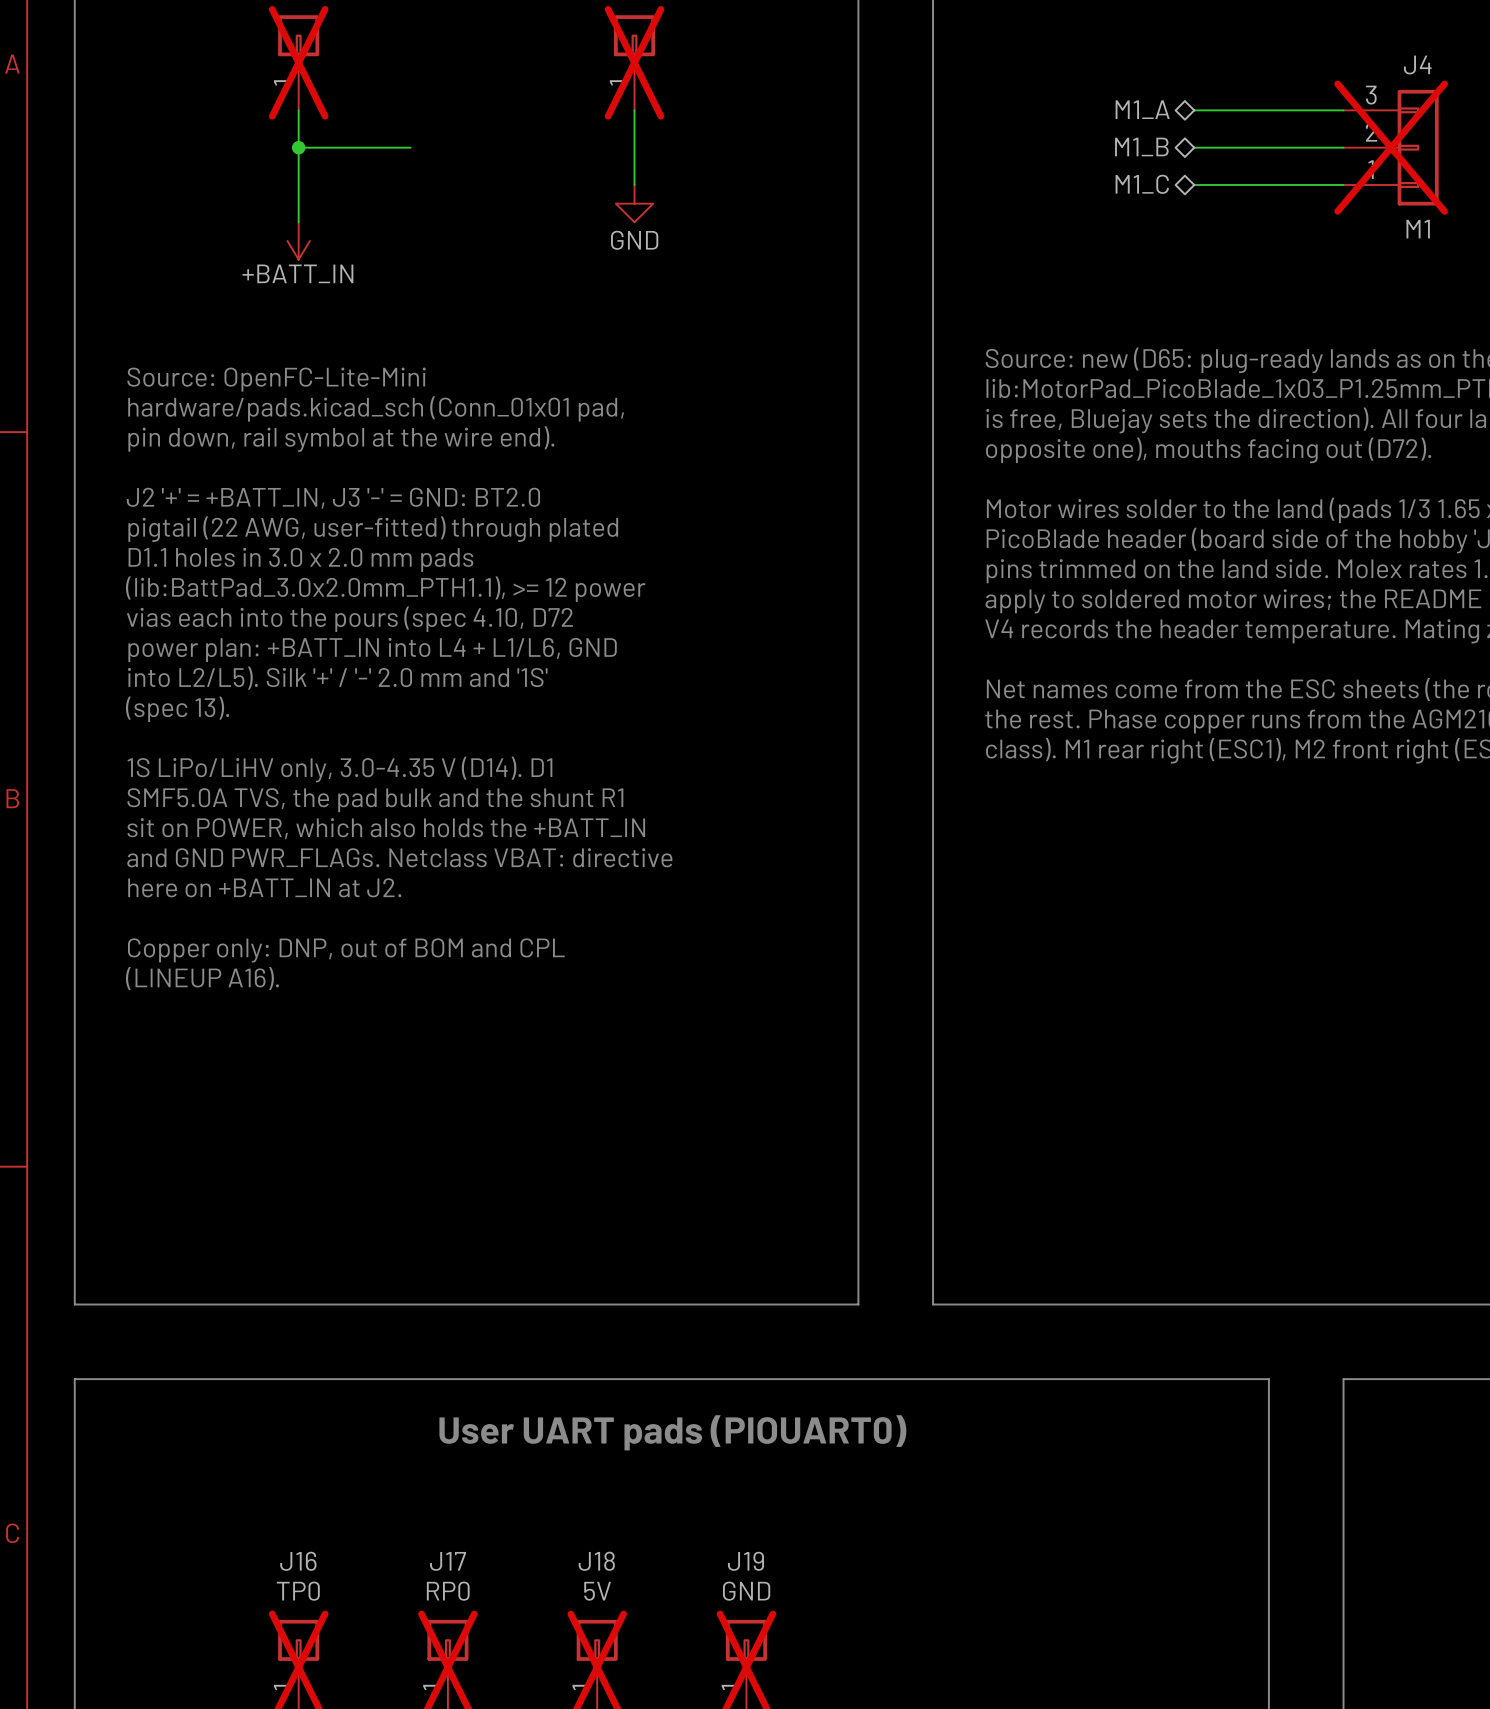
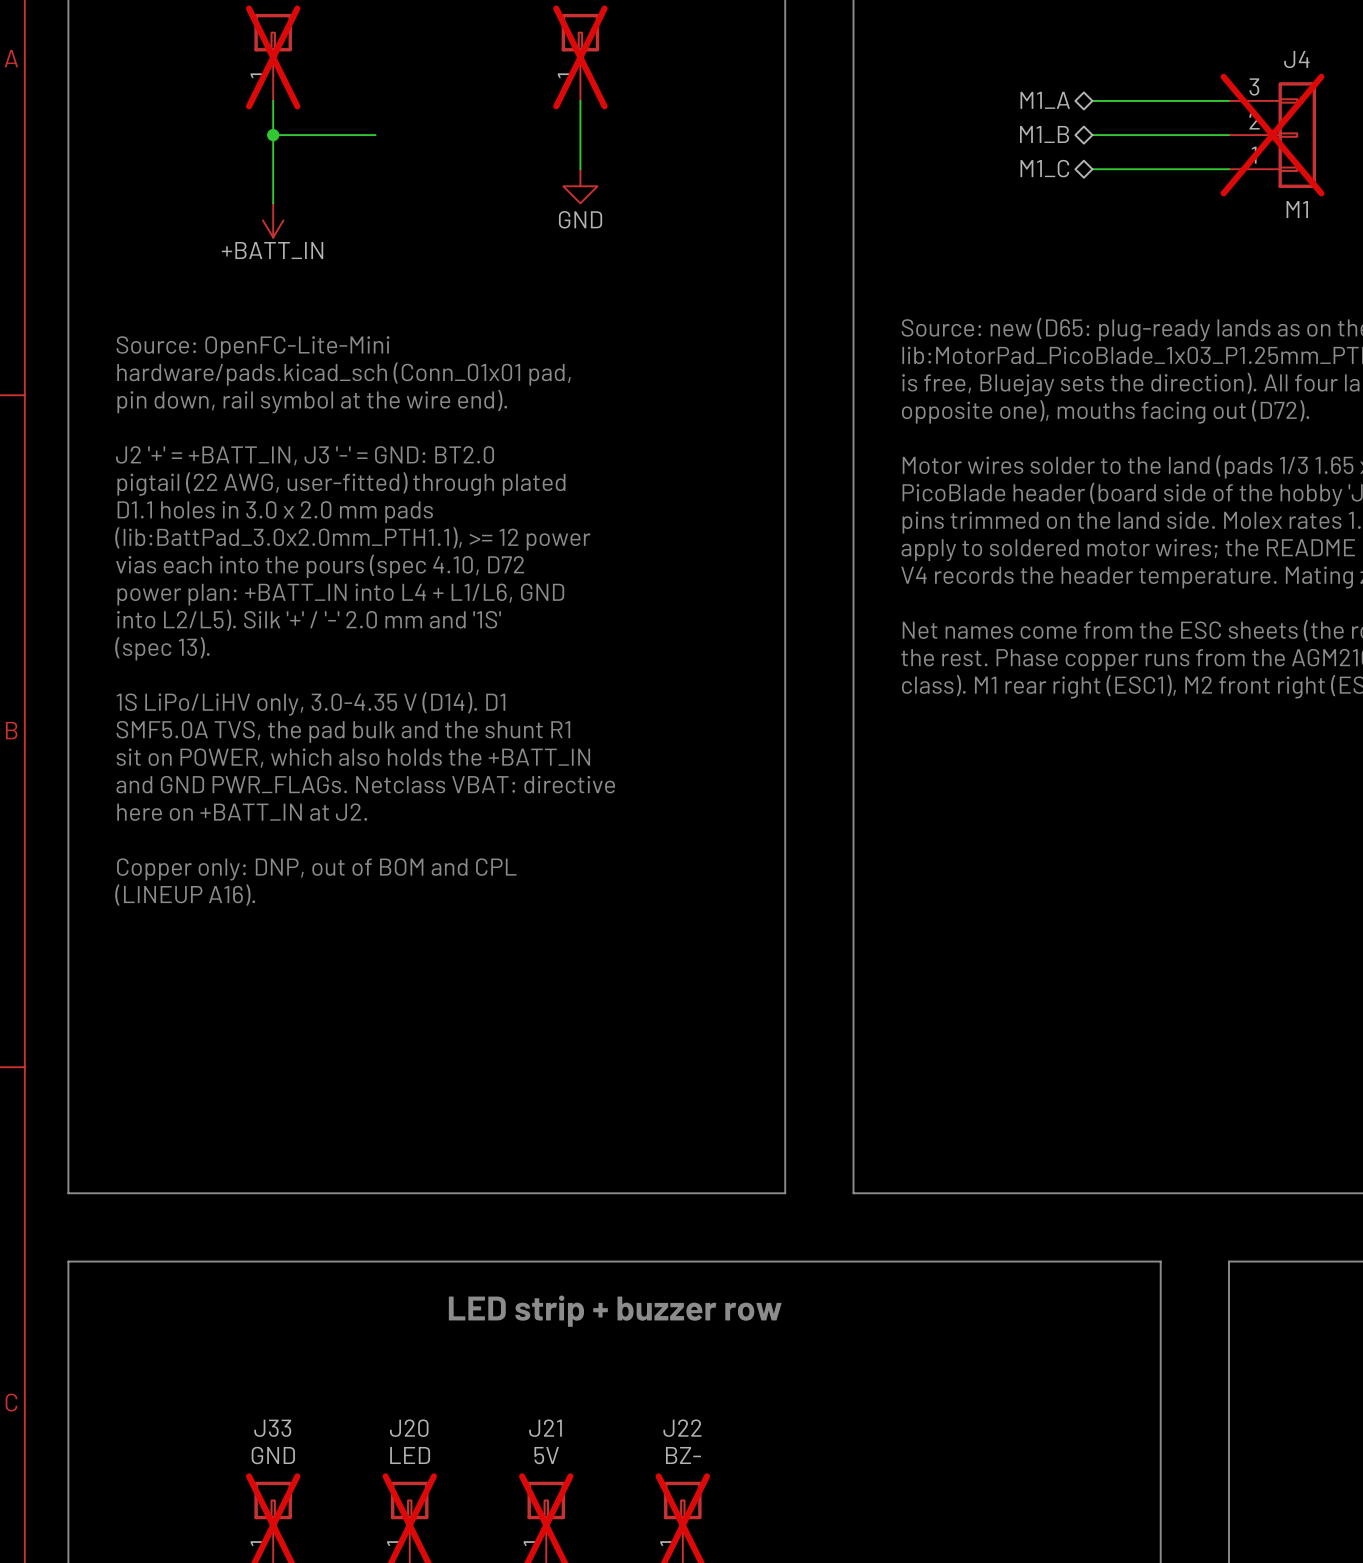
text: User UART pads (PIOUART0) (672, 1432) -> LED strip + buzzer row (615, 1311)
J16 name: J16 (298, 1561) -> J33 (272, 1428)
J17 name: J17 (448, 1561) -> J20 (409, 1428)
J18 name: J18 (596, 1561) -> J21 (545, 1428)
J19 name: J19 (745, 1561) -> J22 (682, 1428)
J16 value: TP0 (298, 1591) -> GND (273, 1455)
J17 value: RP0 (448, 1591) -> LED (410, 1455)
J19 value: GND (746, 1591) -> BZ- (683, 1455)

